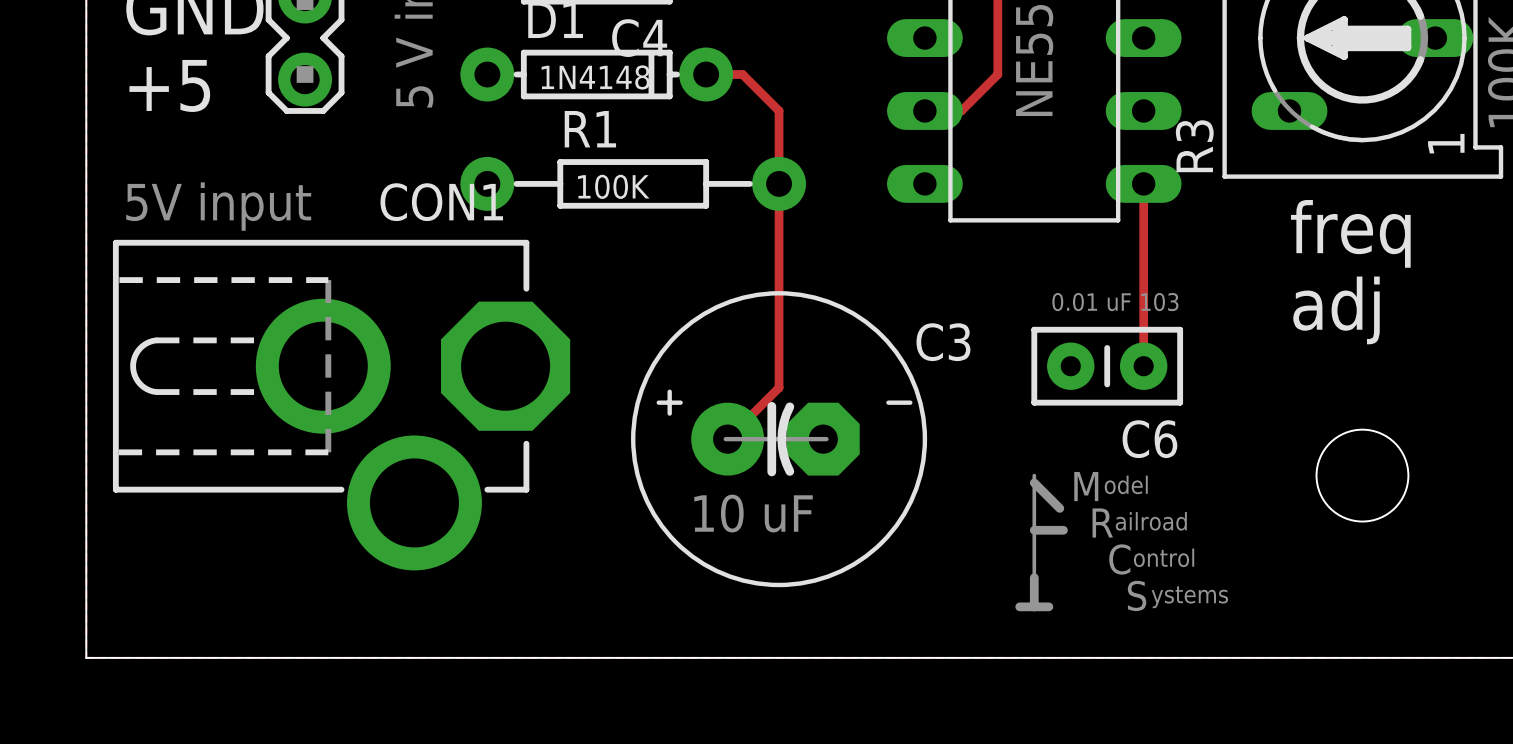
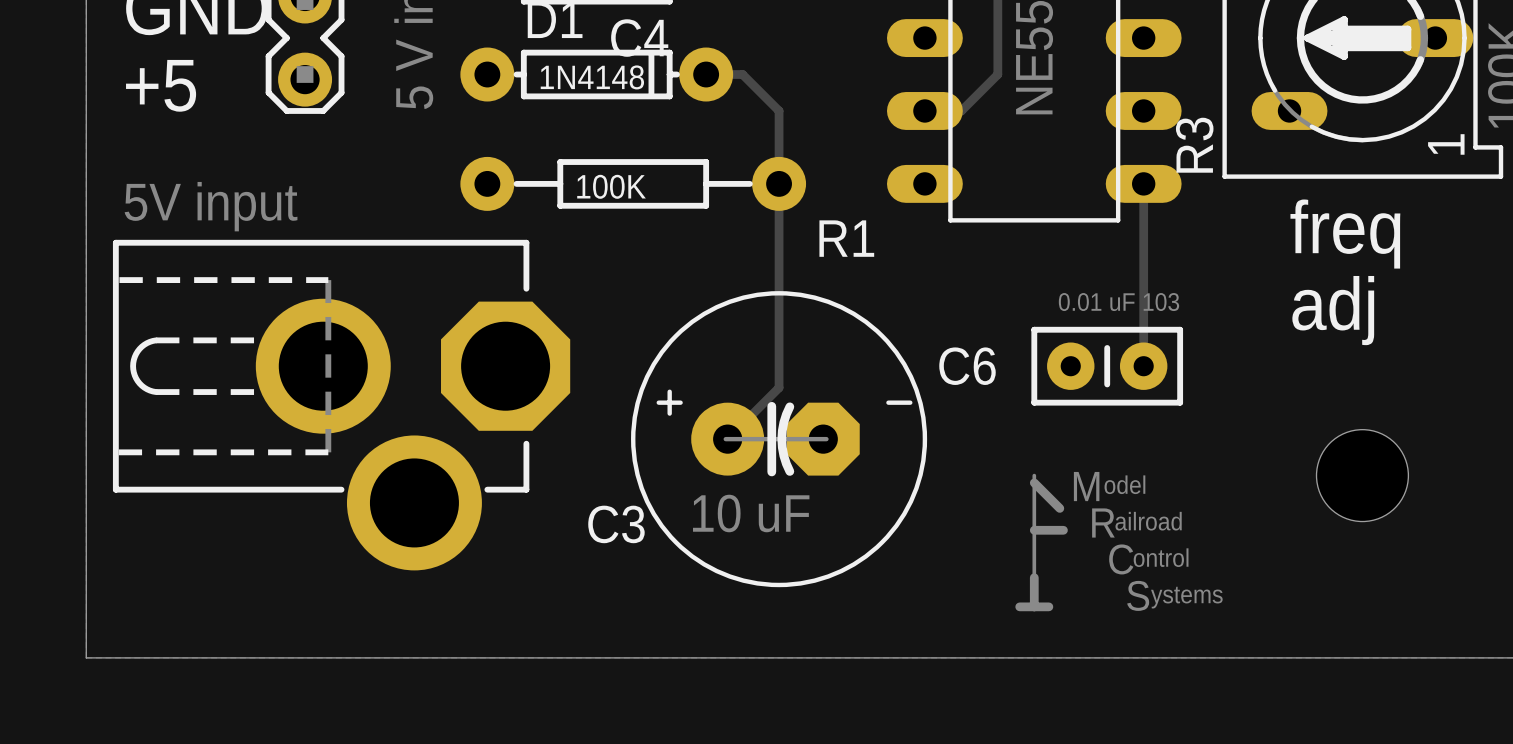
R1 name position: R1 (590, 129) -> R1 (846, 238)
CON1 name: CON1 (441, 202) -> none
C3 name position: C3 (943, 342) -> C3 (616, 524)
C6 name position: C6 (1149, 439) -> C6 (967, 366)

